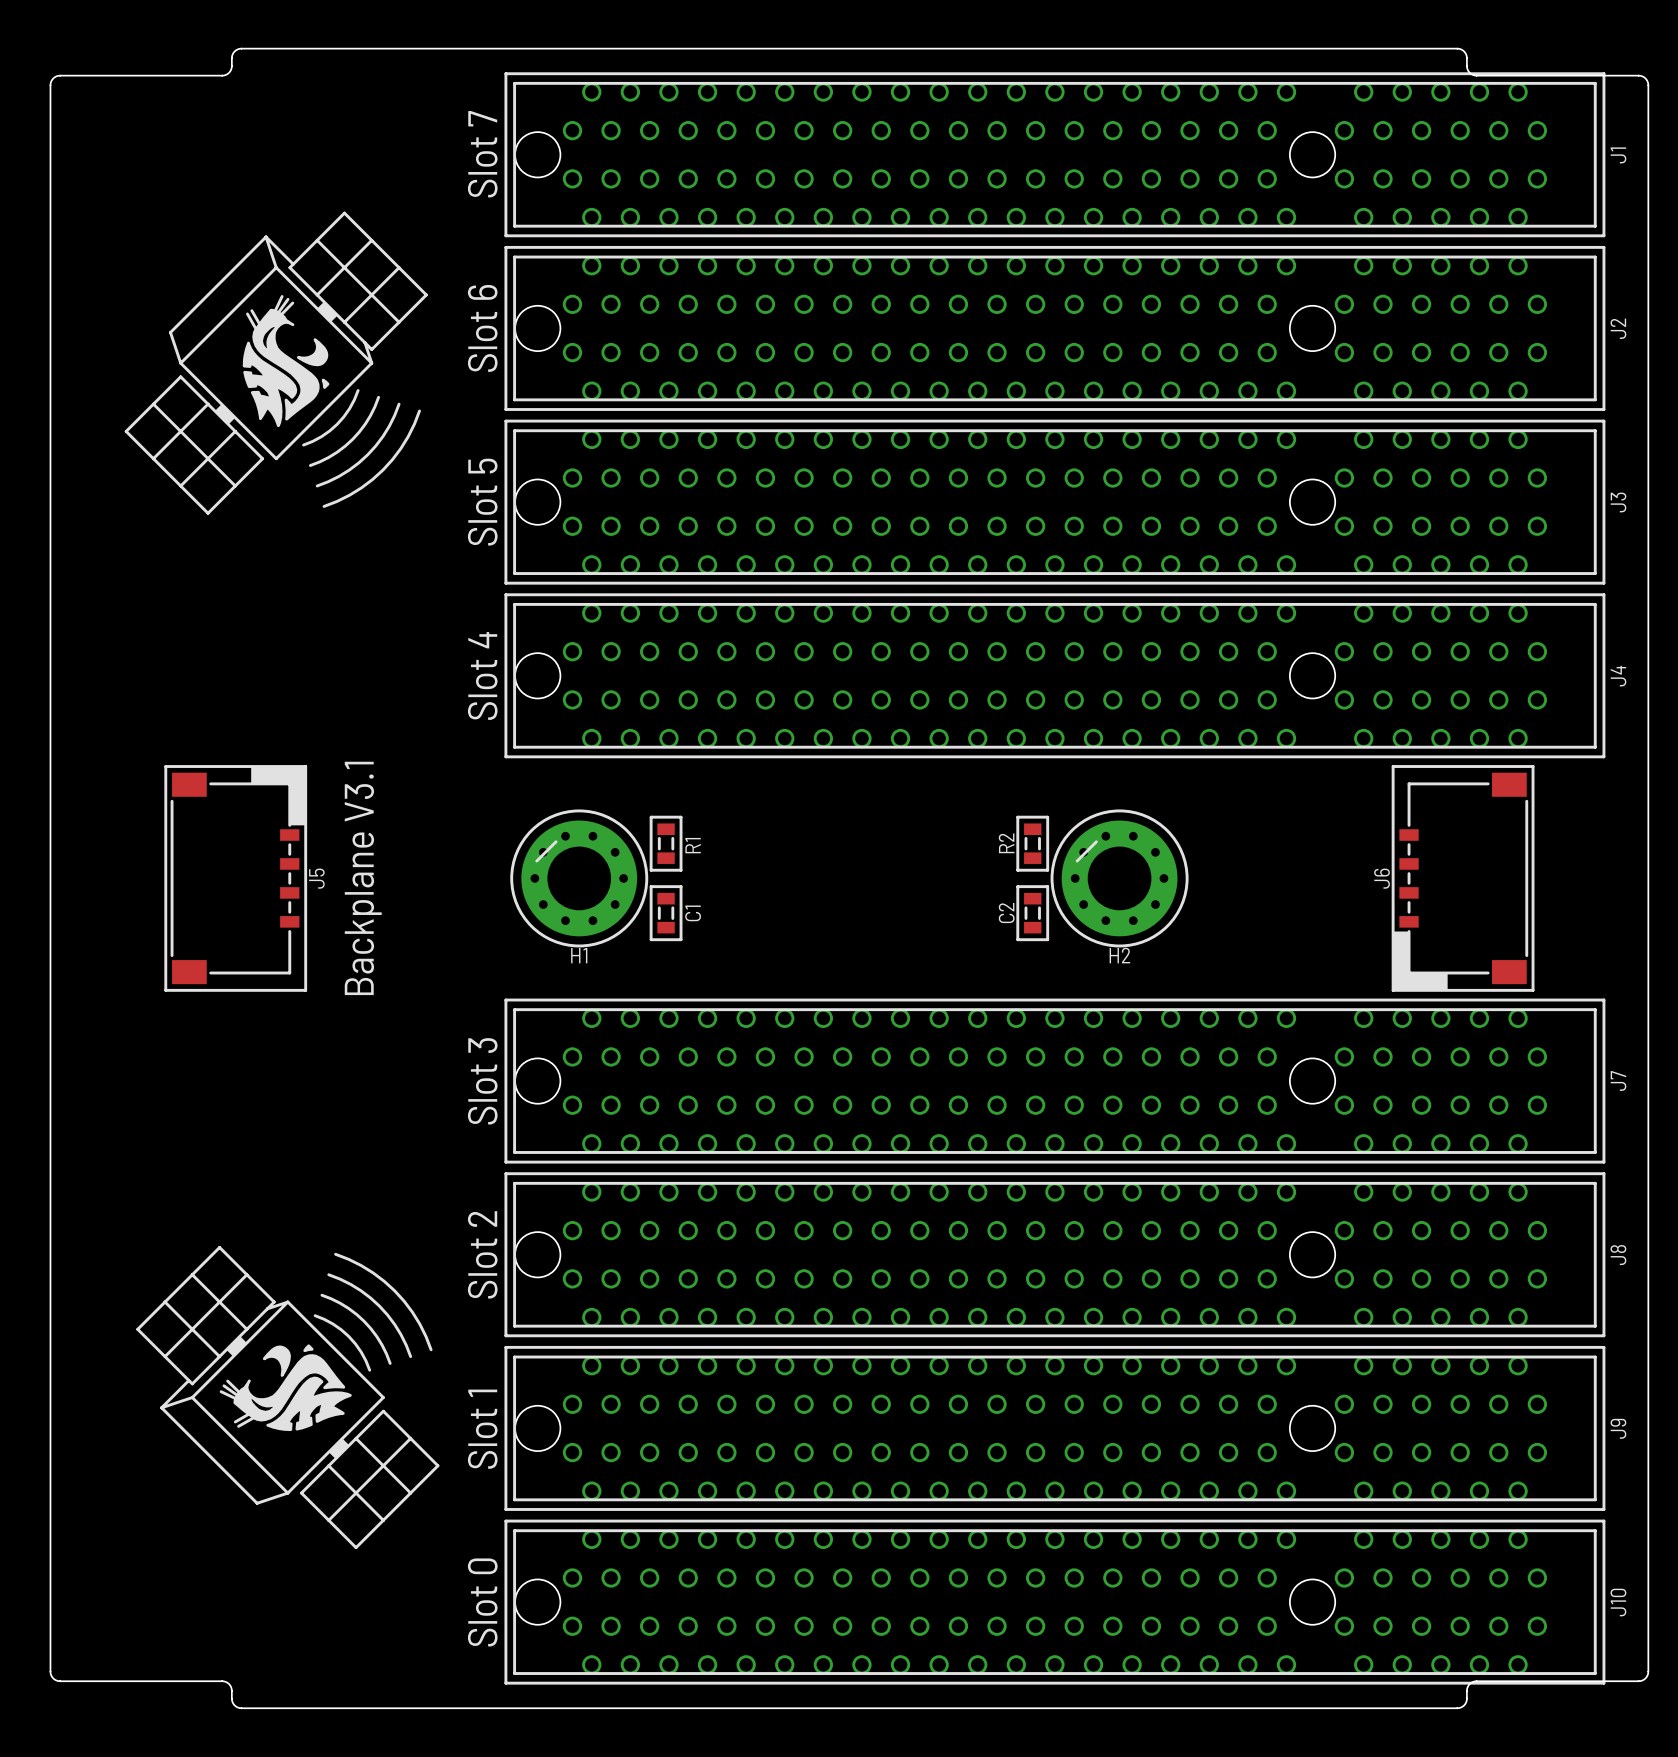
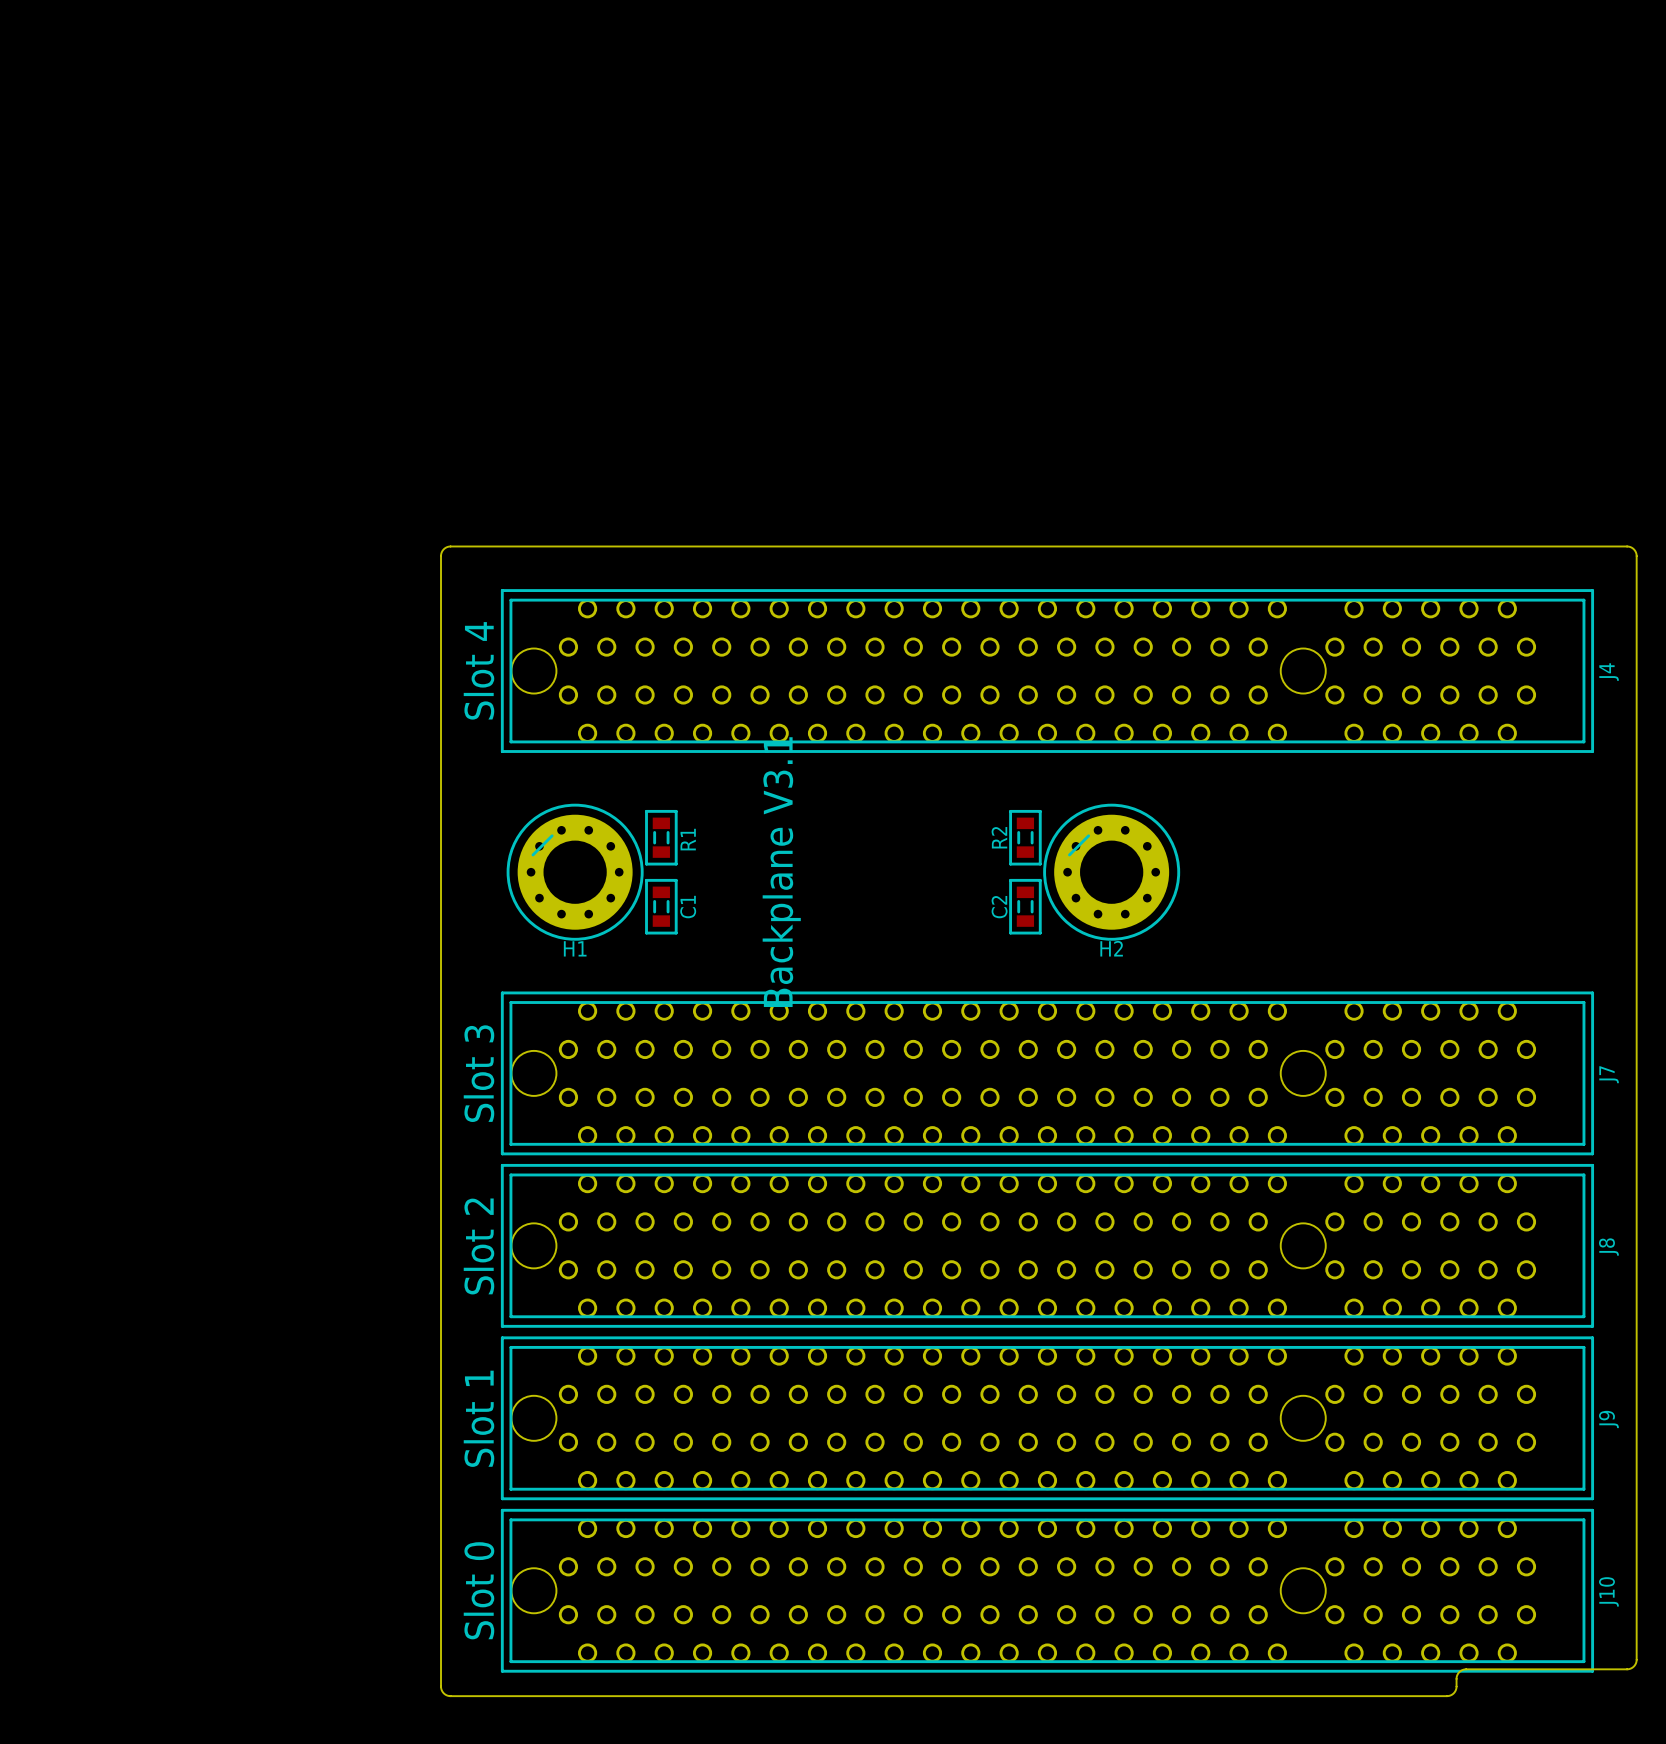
text: Slot 7 (482, 154) -> none
J1: (1054, 154) -> none
drawing: [124, 211, 428, 515] -> none
text: Slot 6 (482, 328) -> none
J2: (1054, 328) -> none
text: Slot 5 (482, 502) -> none
J3: (1054, 502) -> none
board edge: (1648, 560) (1648, 85) (1646, 79) (1641, 75) (1475, 75) (1467, 69) (1464, 52) (1457, 48) (241, 48) (233, 52) (231, 69) (223, 75) (60, 75) (53, 78) (50, 85) (50, 1674) (54, 1679) (60, 1681) (223, 1681) (230, 1686) (232, 1702) (240, 1708) (453, 1708) -> (1636, 556) (1633, 549) (1627, 546) (450, 546) (443, 549) (441, 556) (441, 1686) (443, 1693) (450, 1696)
J5: (235, 878) -> none
text position: Backplane V3.1 (363, 878) -> Backplane V3.1 (781, 872)
J6: (1463, 878) -> none
drawing: [136, 1246, 440, 1550] -> none

